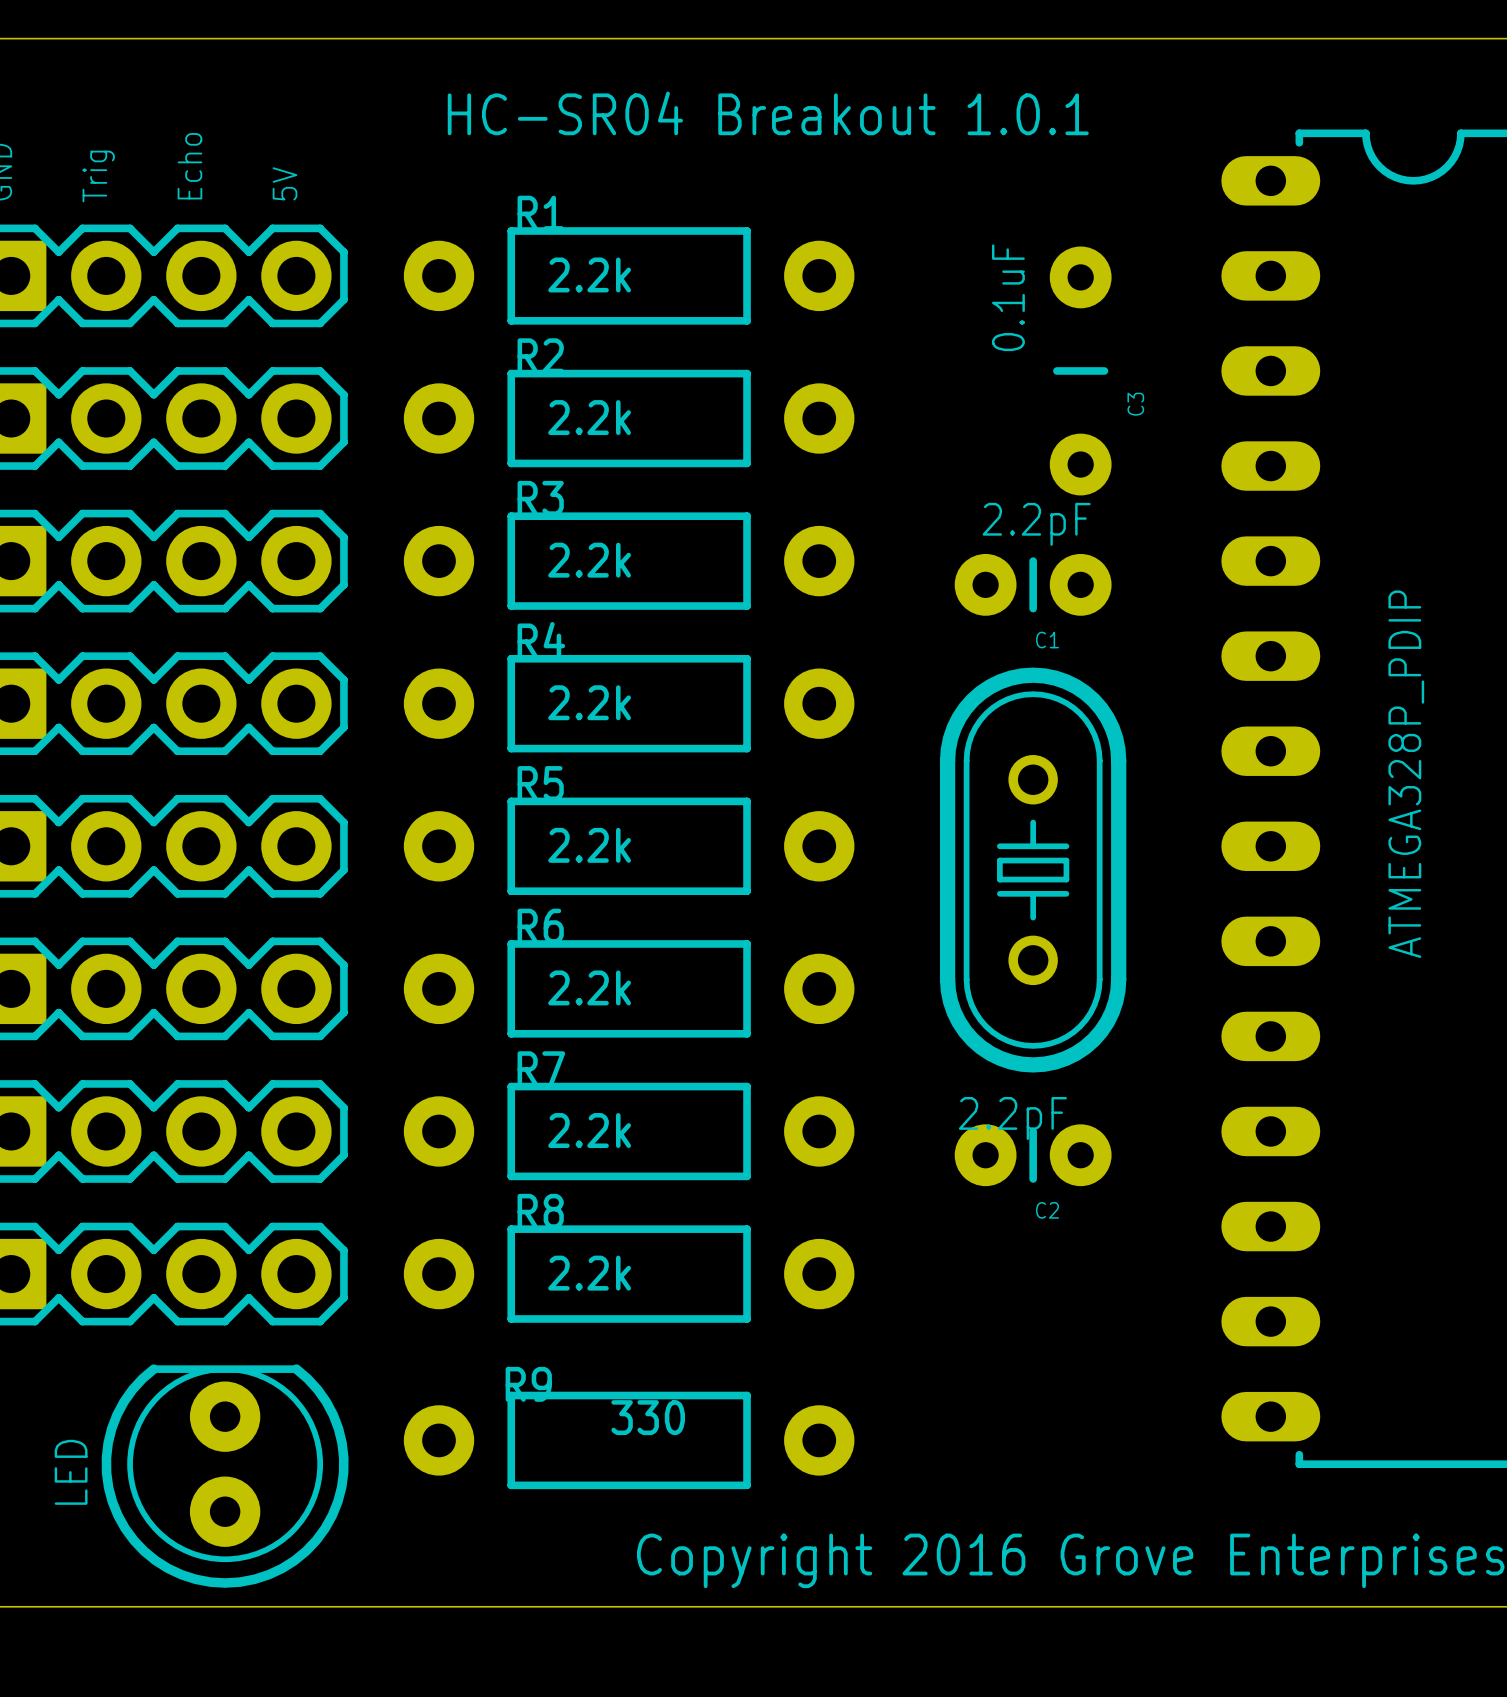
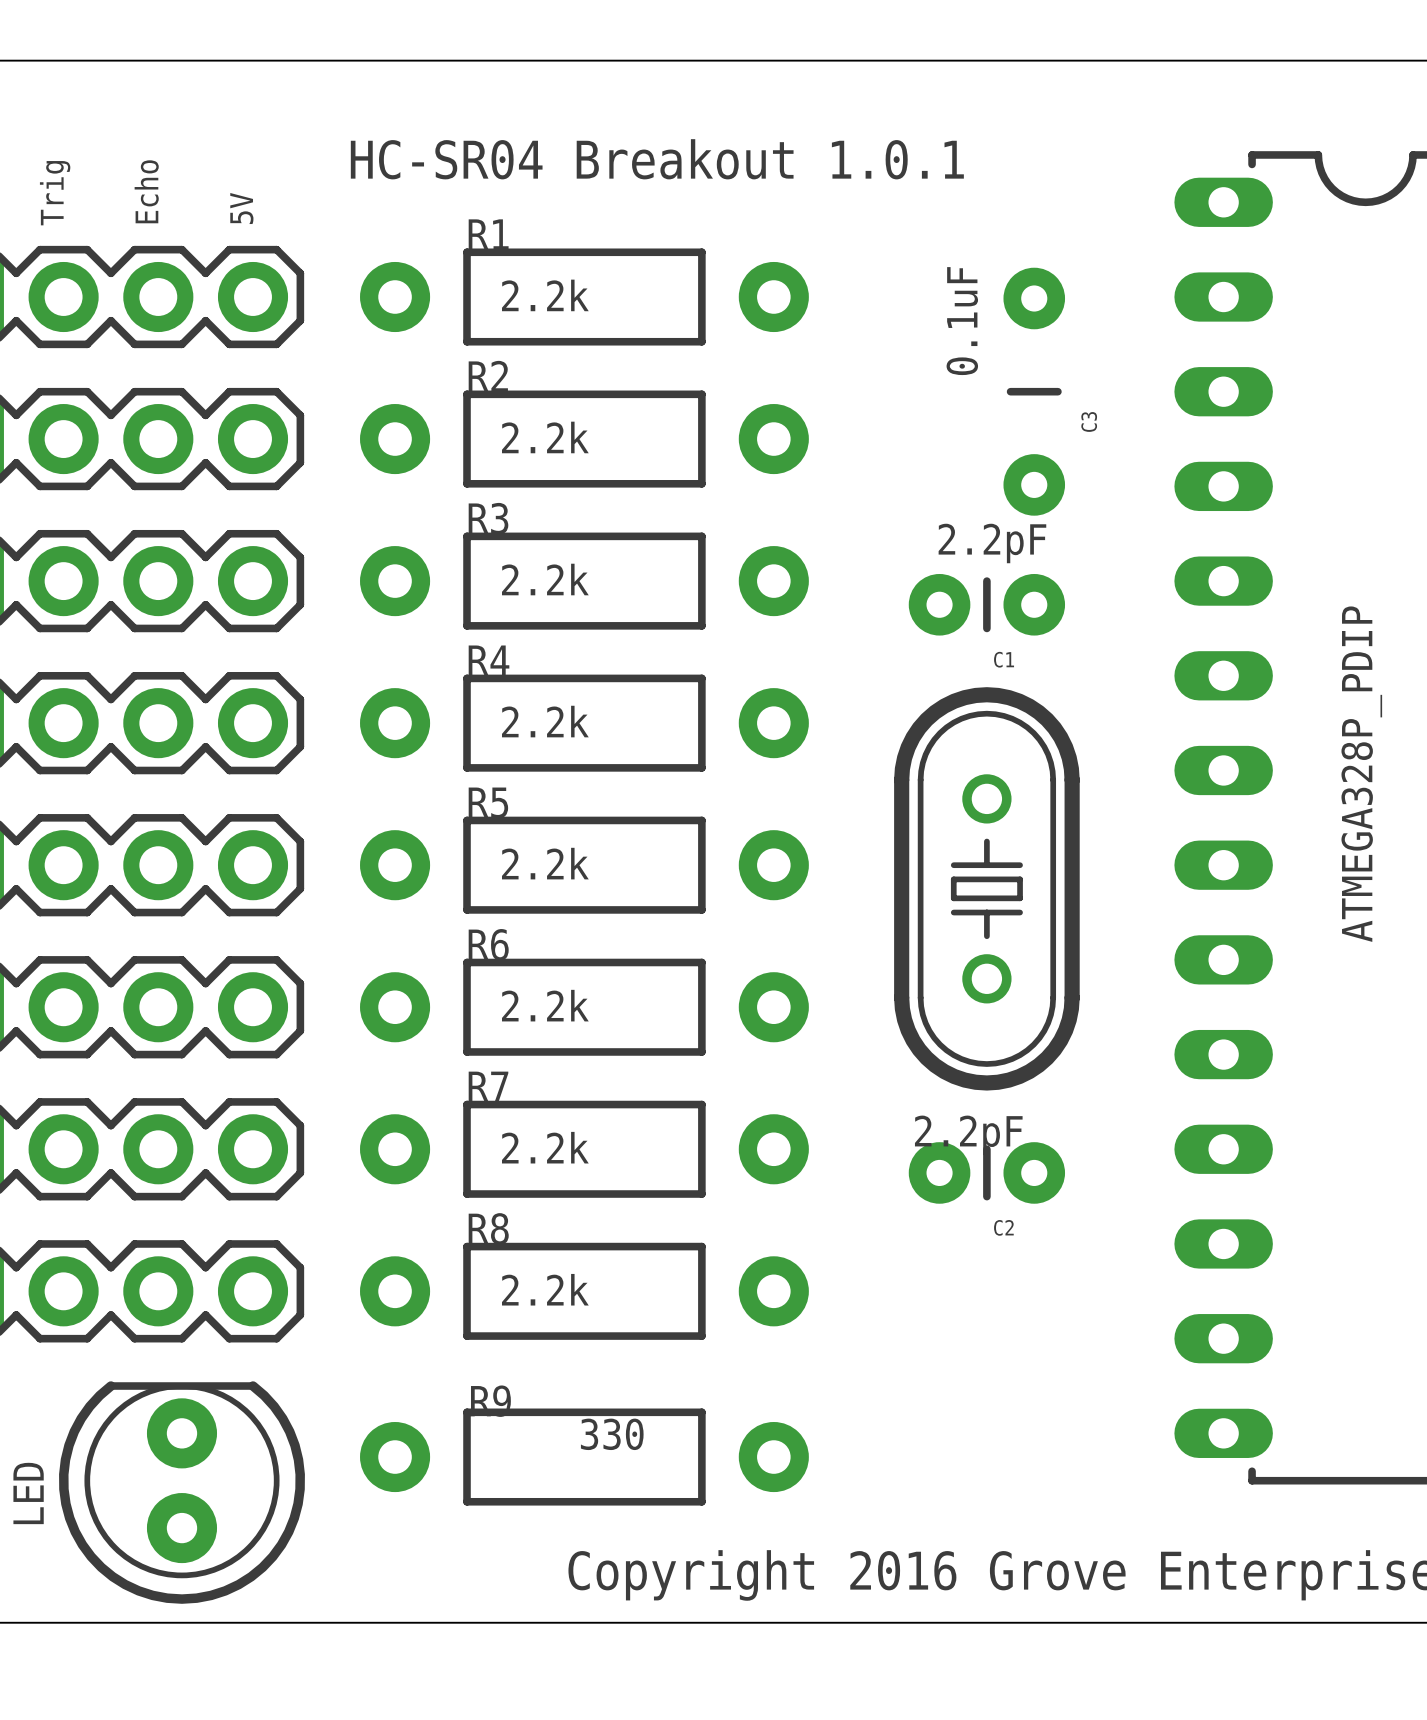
text position: HC-SR04 Breakout 1.0.1 (768, 113) -> HC-SR04 Breakout 1.0.1 (657, 159)

